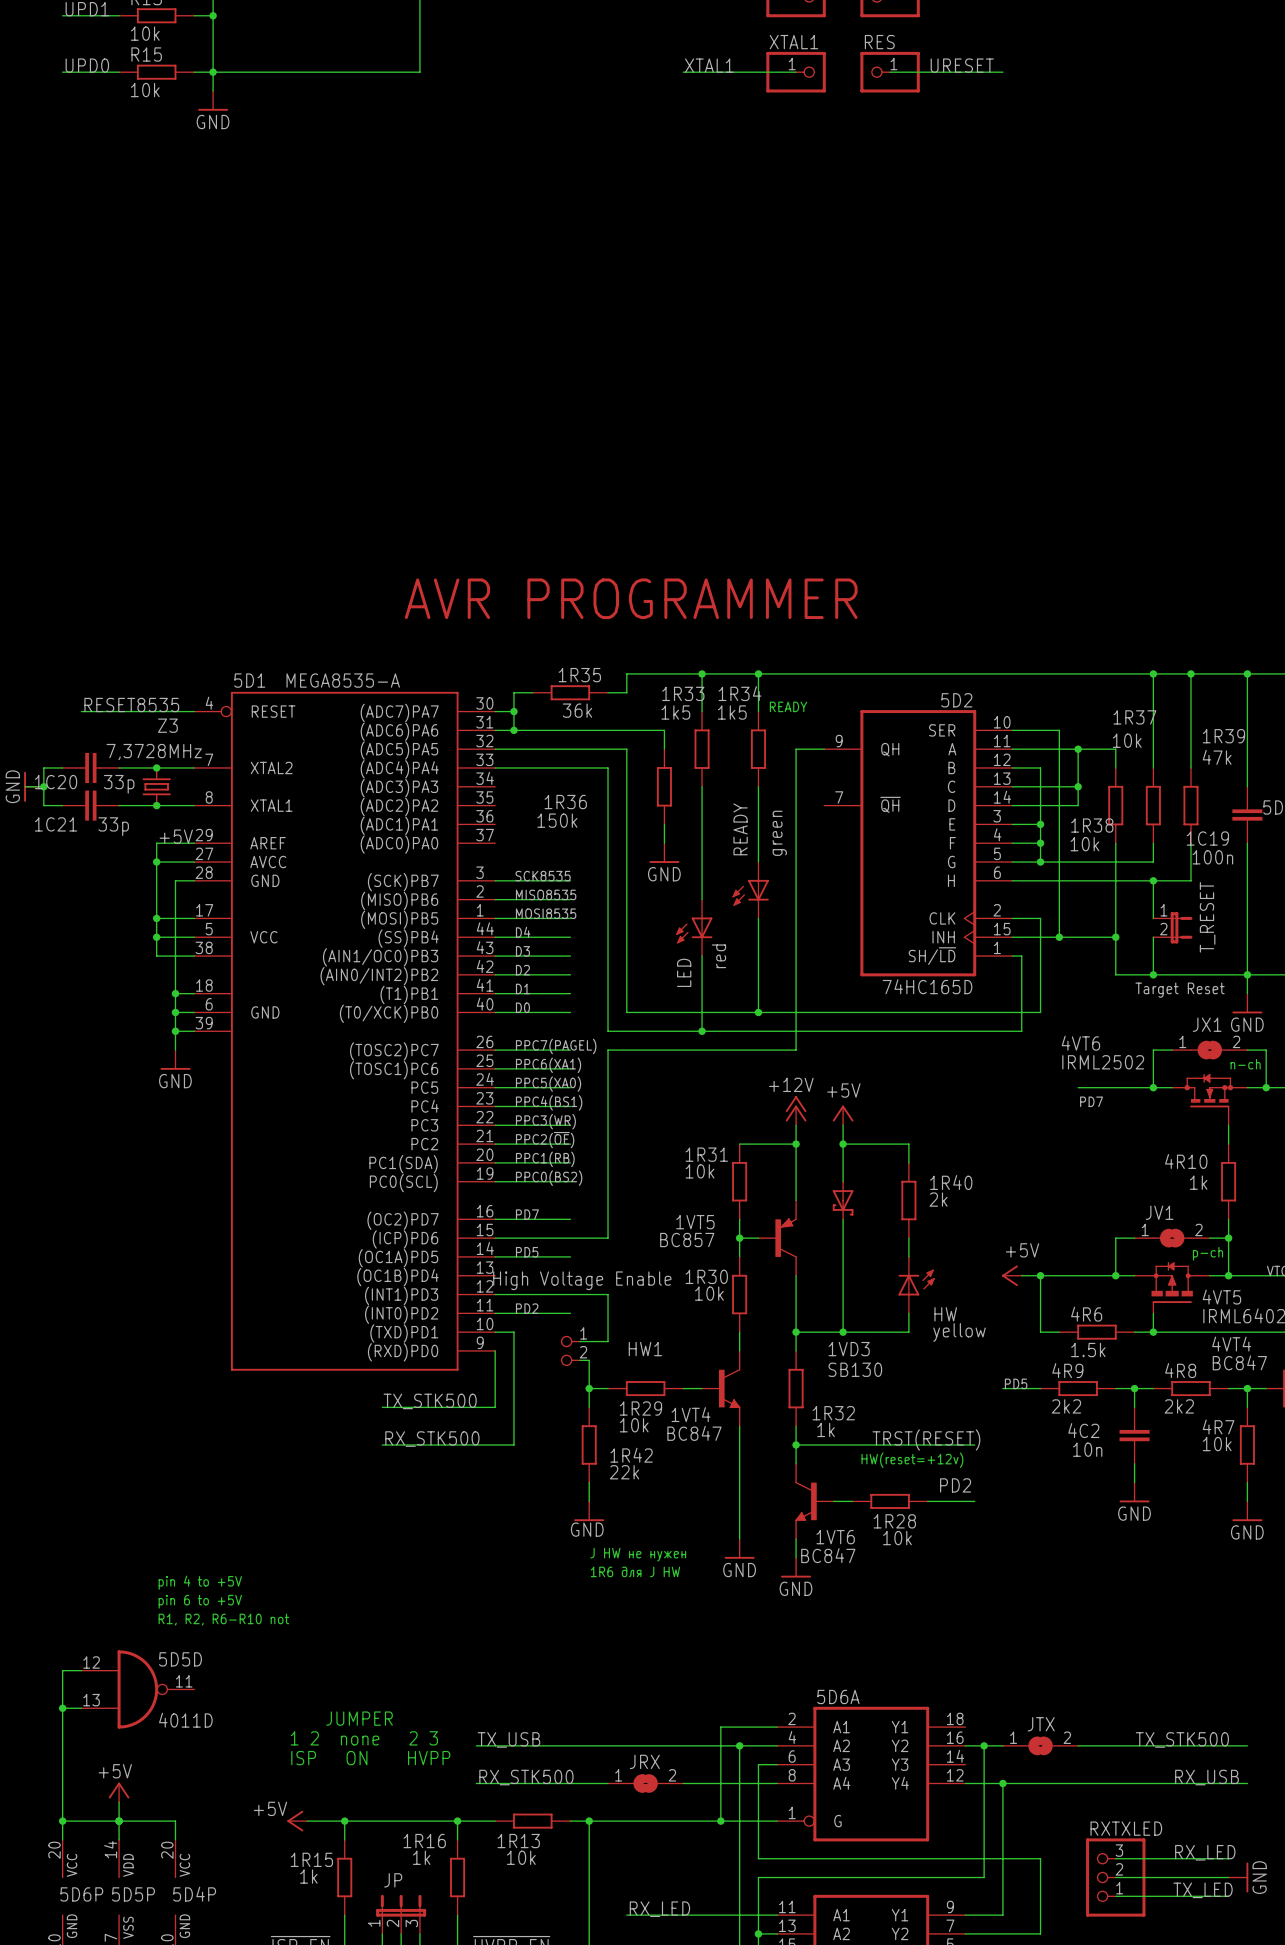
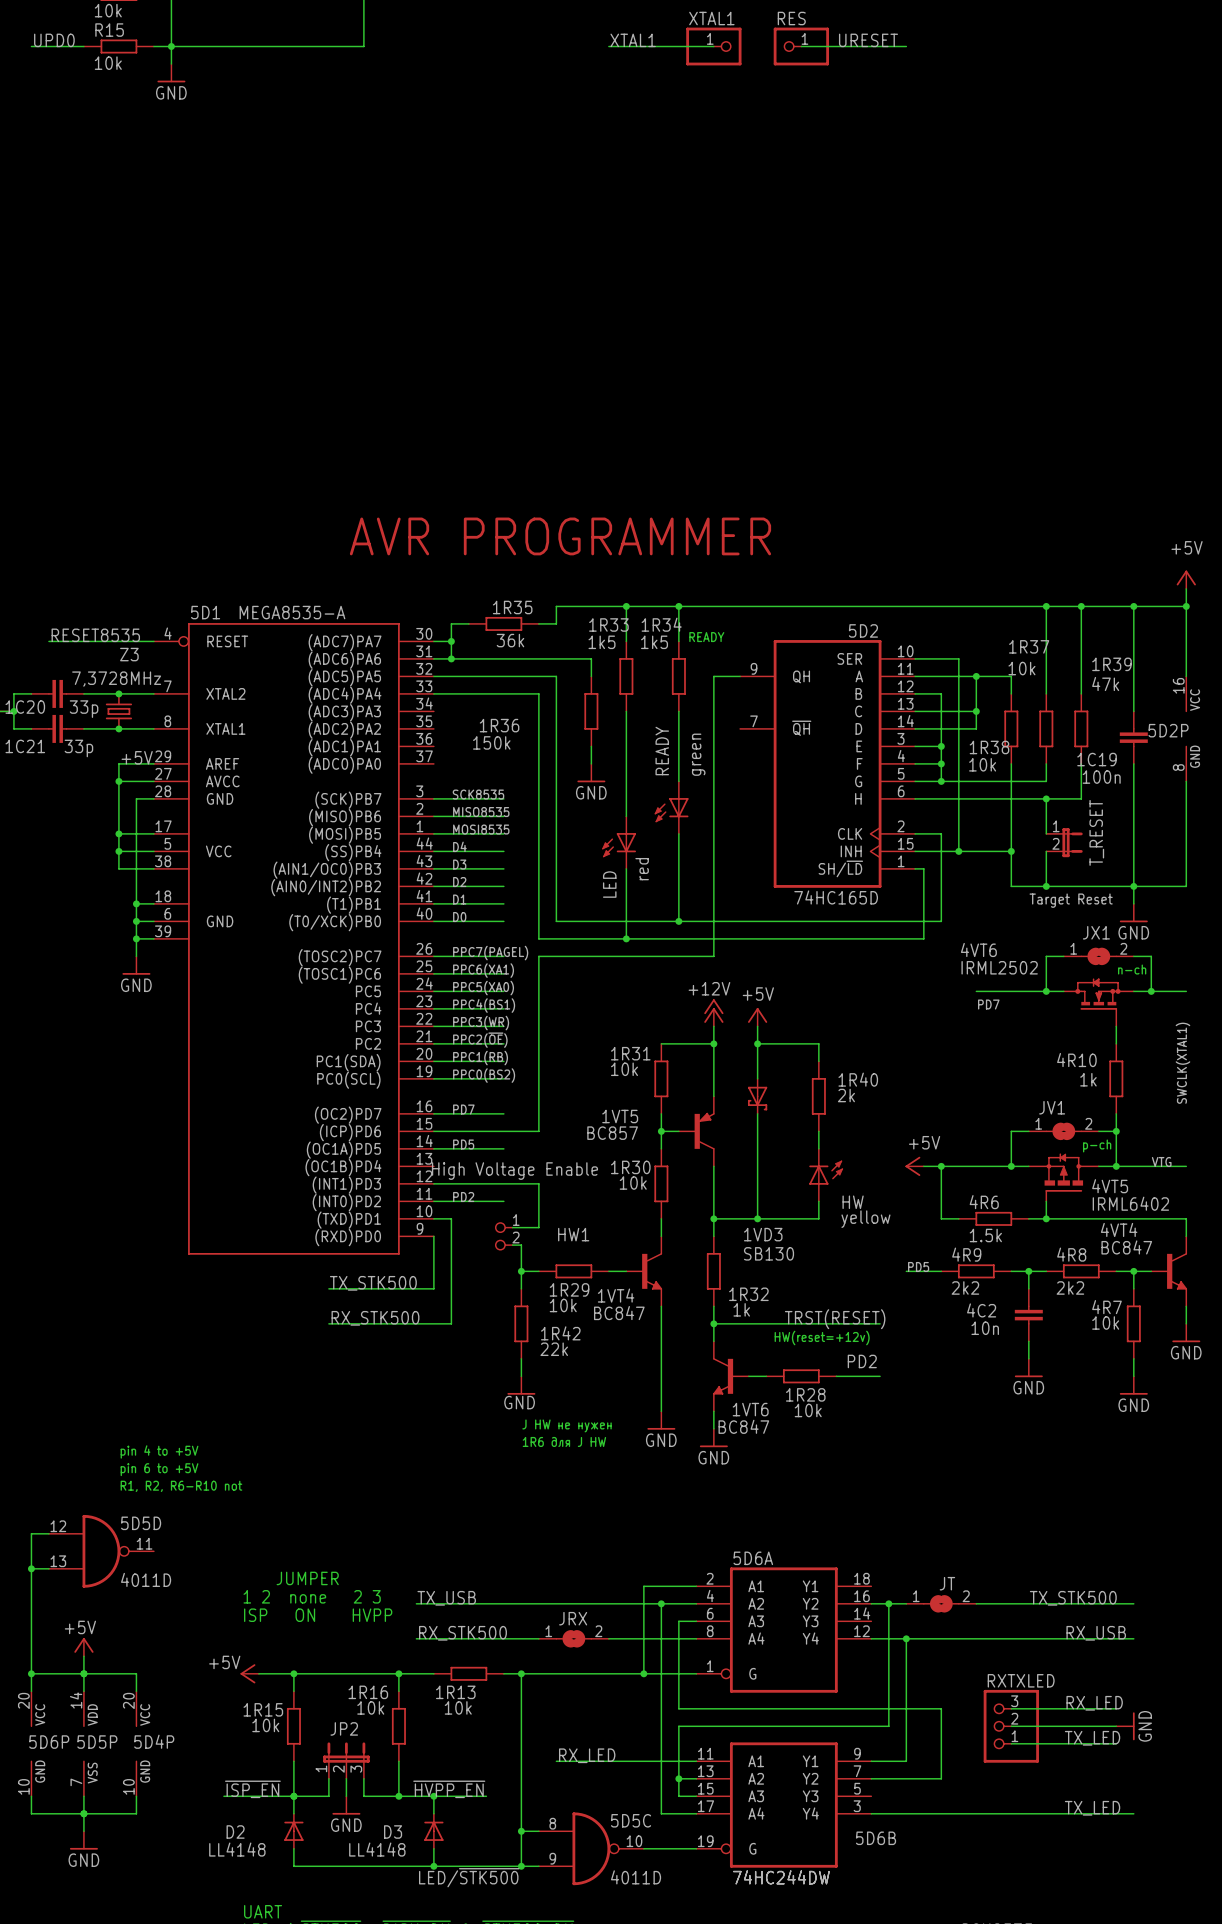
JTX name: JTX (1041, 1724) -> JT (947, 1583)
1R16 value: 1k (421, 1857) -> 10k (370, 1707)
1R15 value: 1k (308, 1876) -> 10k (265, 1725)
JP name: JP (393, 1880) -> JP2 (344, 1728)

